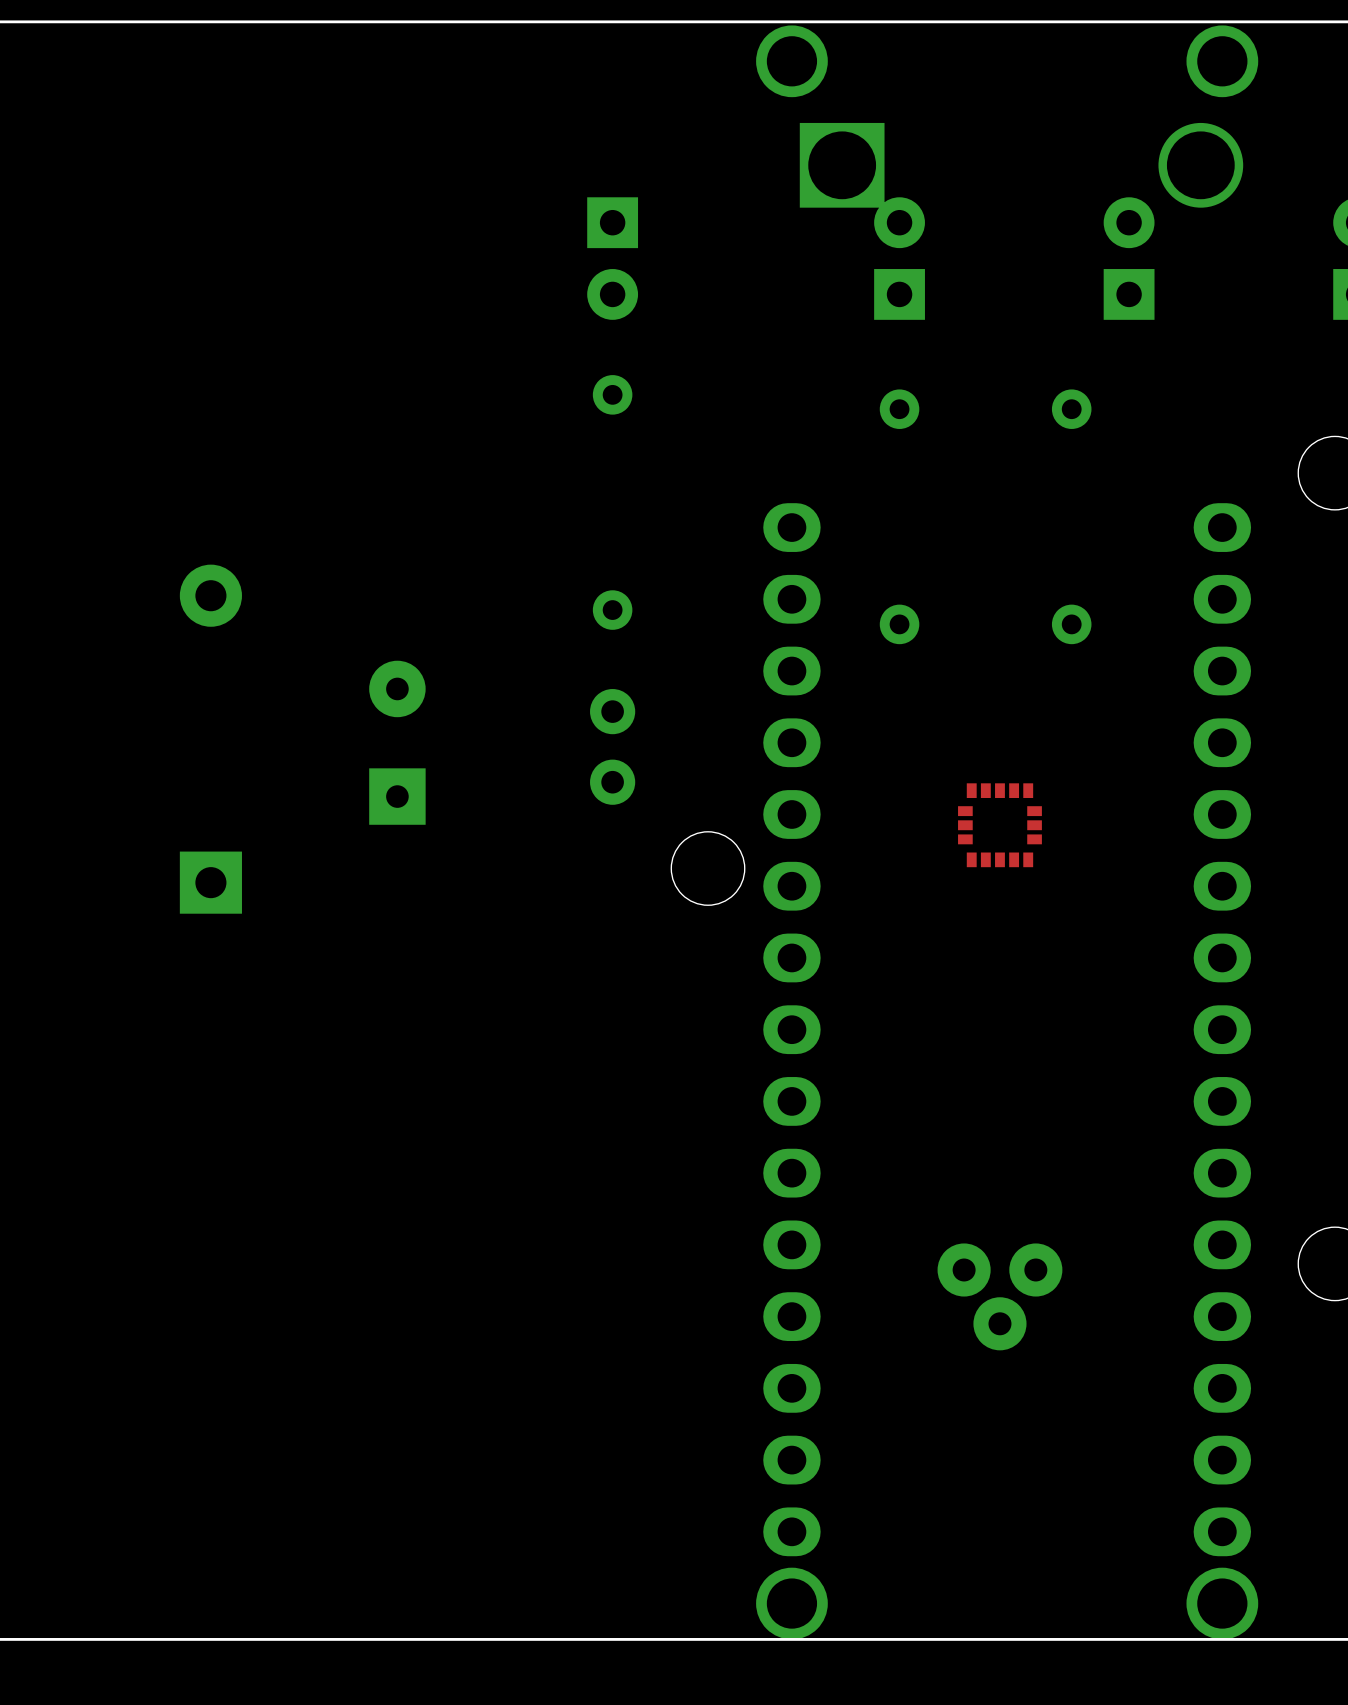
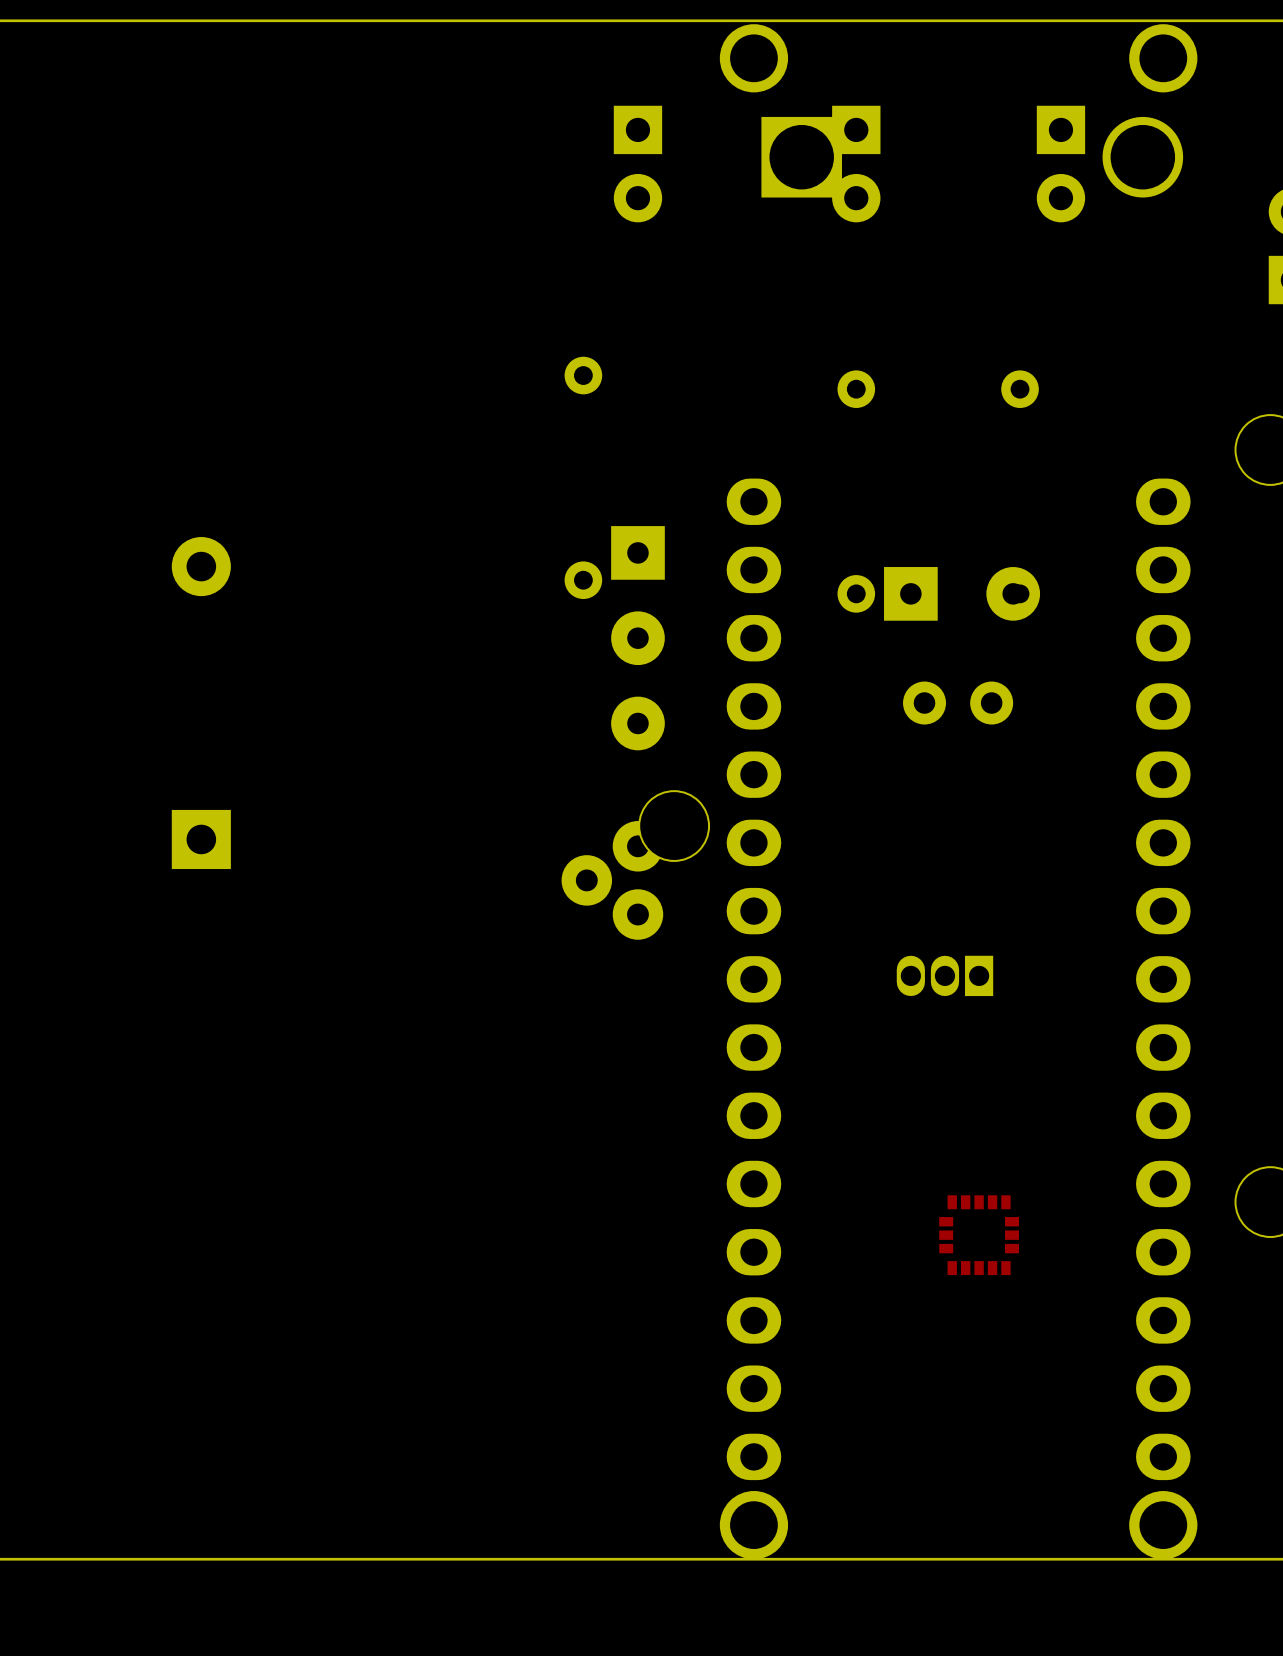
part position: (612, 258) -> (637, 164)
part rotation: 0° (899, 258) -> 180° (856, 164)
part position: (899, 258) -> (856, 164)
part rotation: 0° (1129, 258) -> 180° (1060, 164)
part position: (1129, 258) -> (1060, 164)
part: none -> (637, 638)
part rotation: 0° (397, 742) -> 90° clockwise (962, 593)
part position: (397, 742) -> (962, 593)
part rotation: 0° (612, 746) -> 90° clockwise (958, 703)
part position: (612, 746) -> (958, 703)
part position: (999, 825) -> (979, 1235)
part: none -> (944, 975)
part rotation: 0° (999, 1296) -> 90° clockwise (612, 880)
part position: (999, 1296) -> (612, 880)

